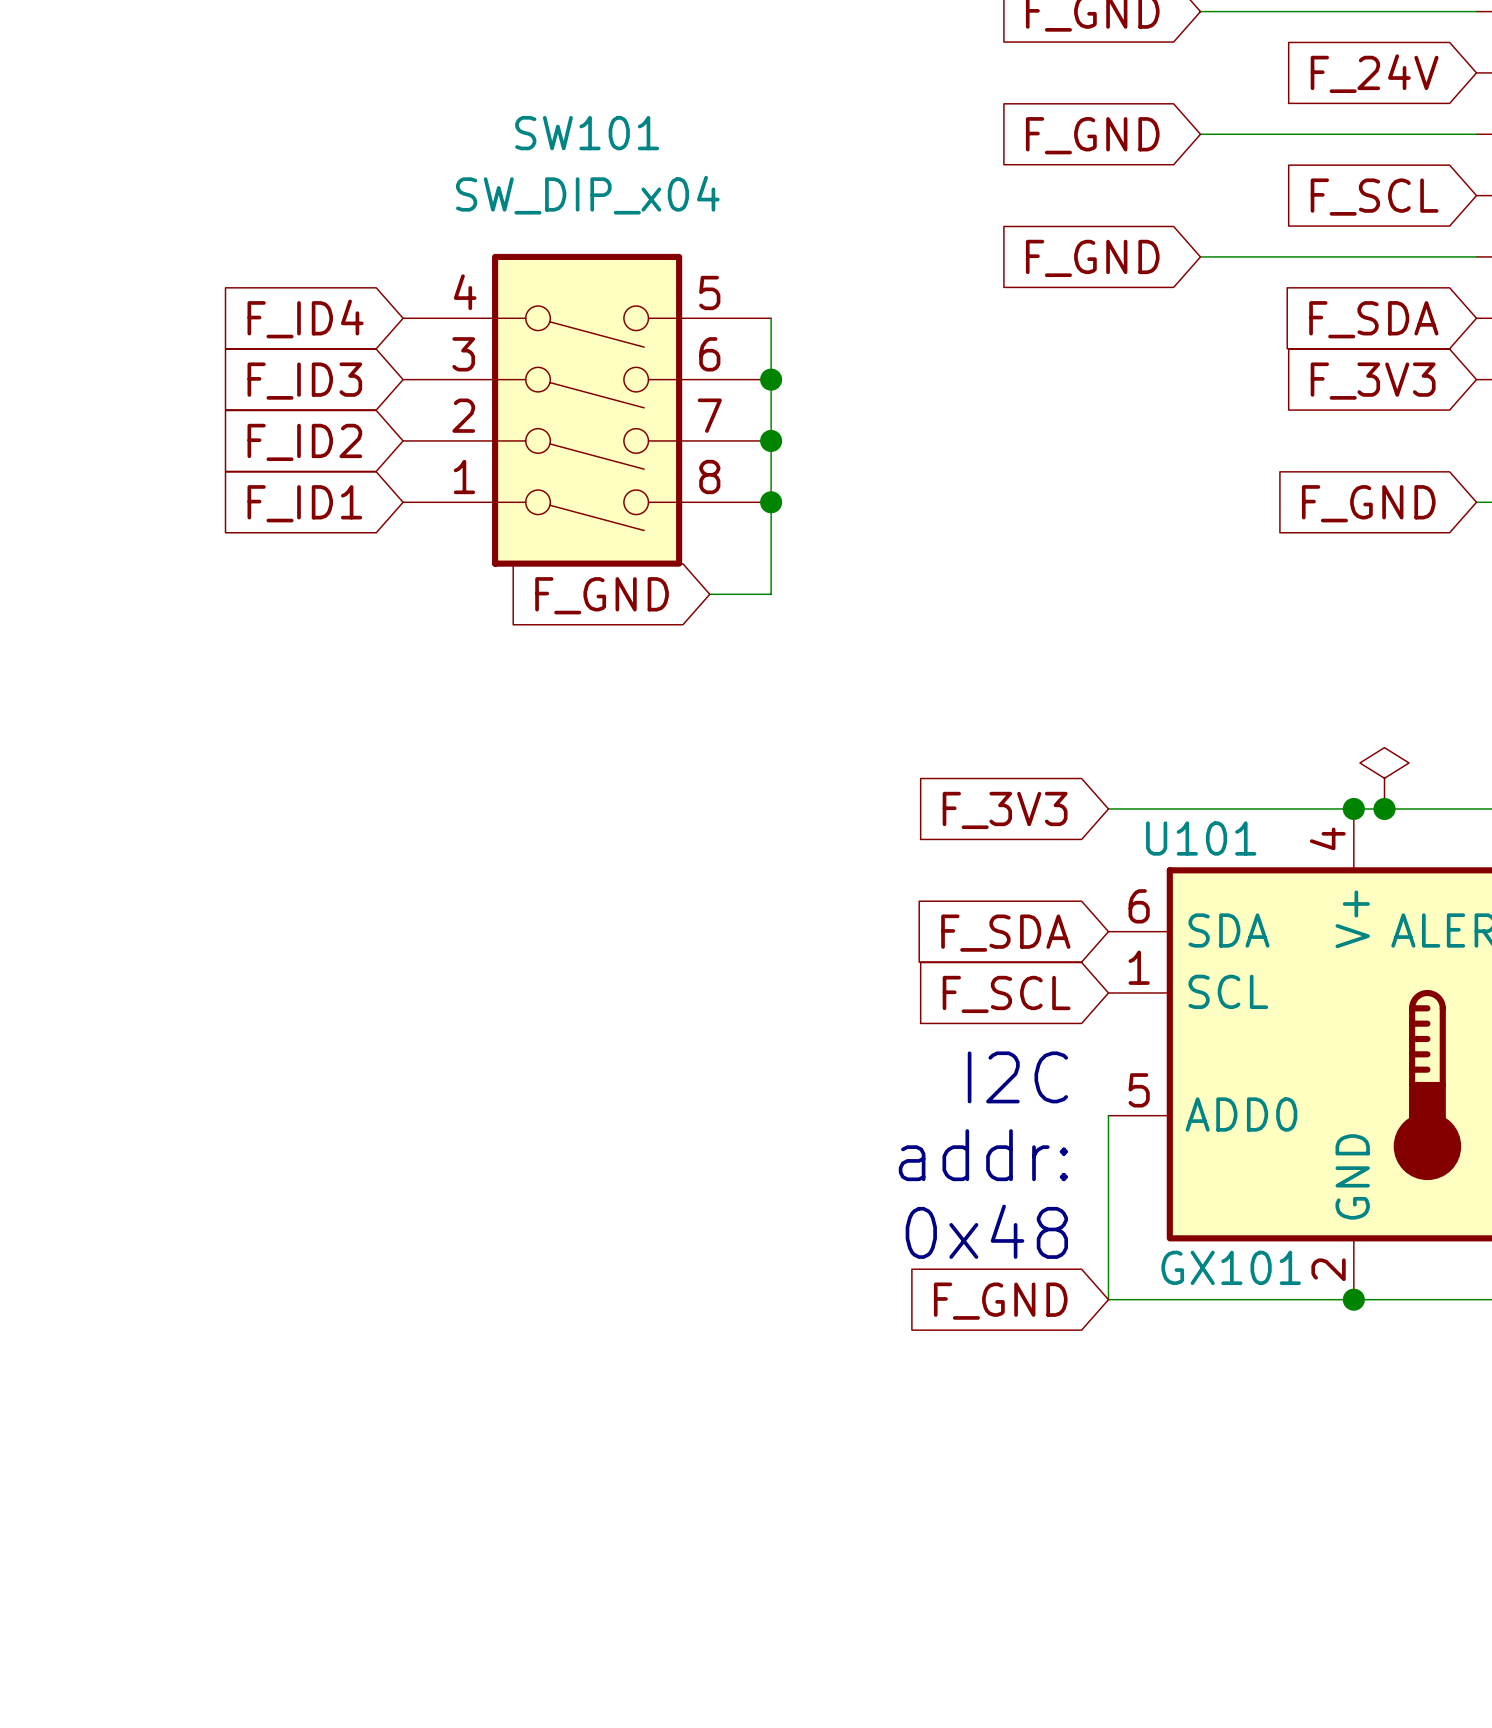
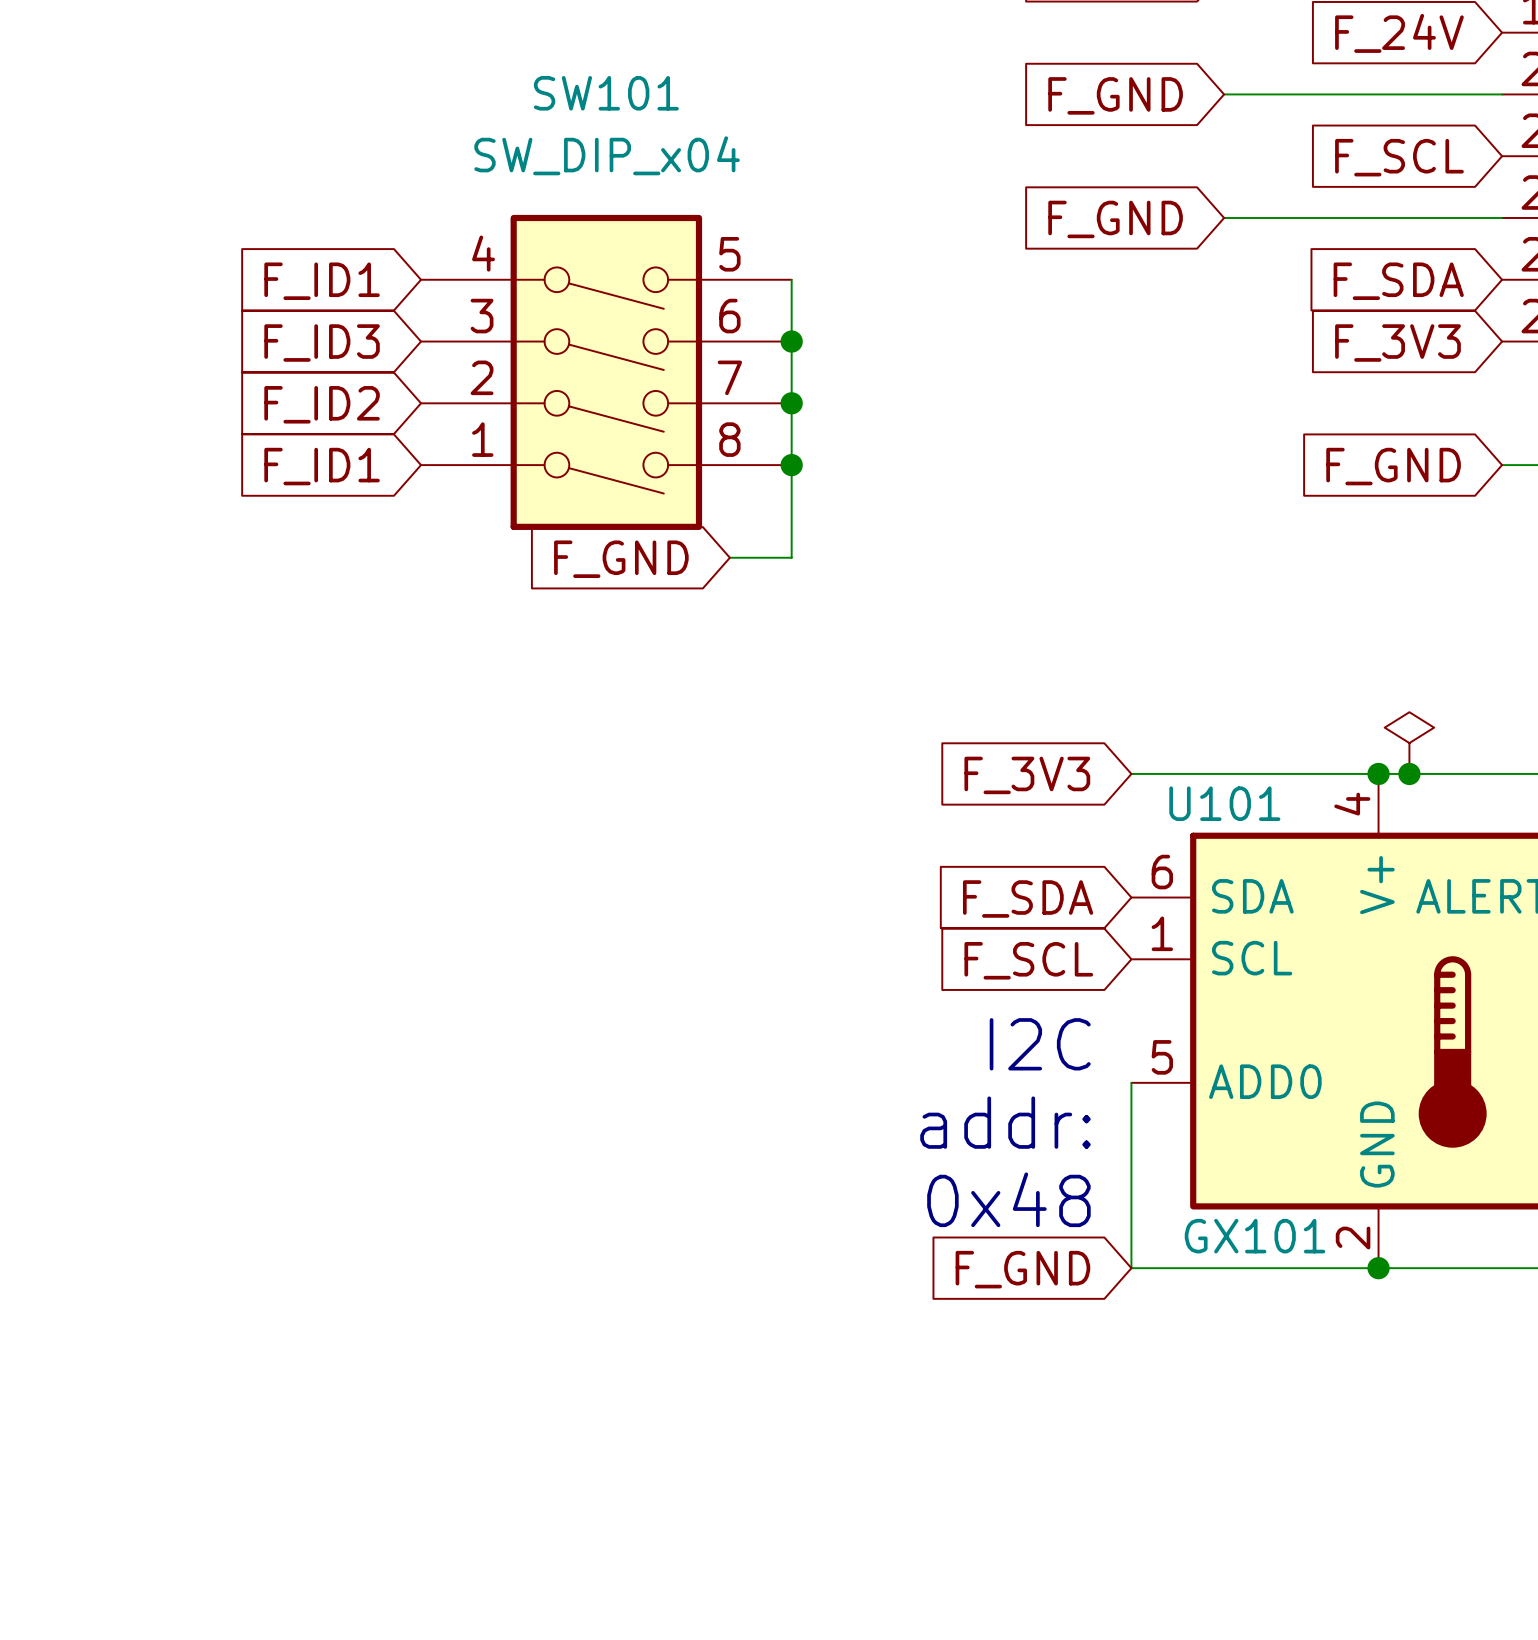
global label: F_ID4 (305, 319) -> F_ID1 (322, 281)

